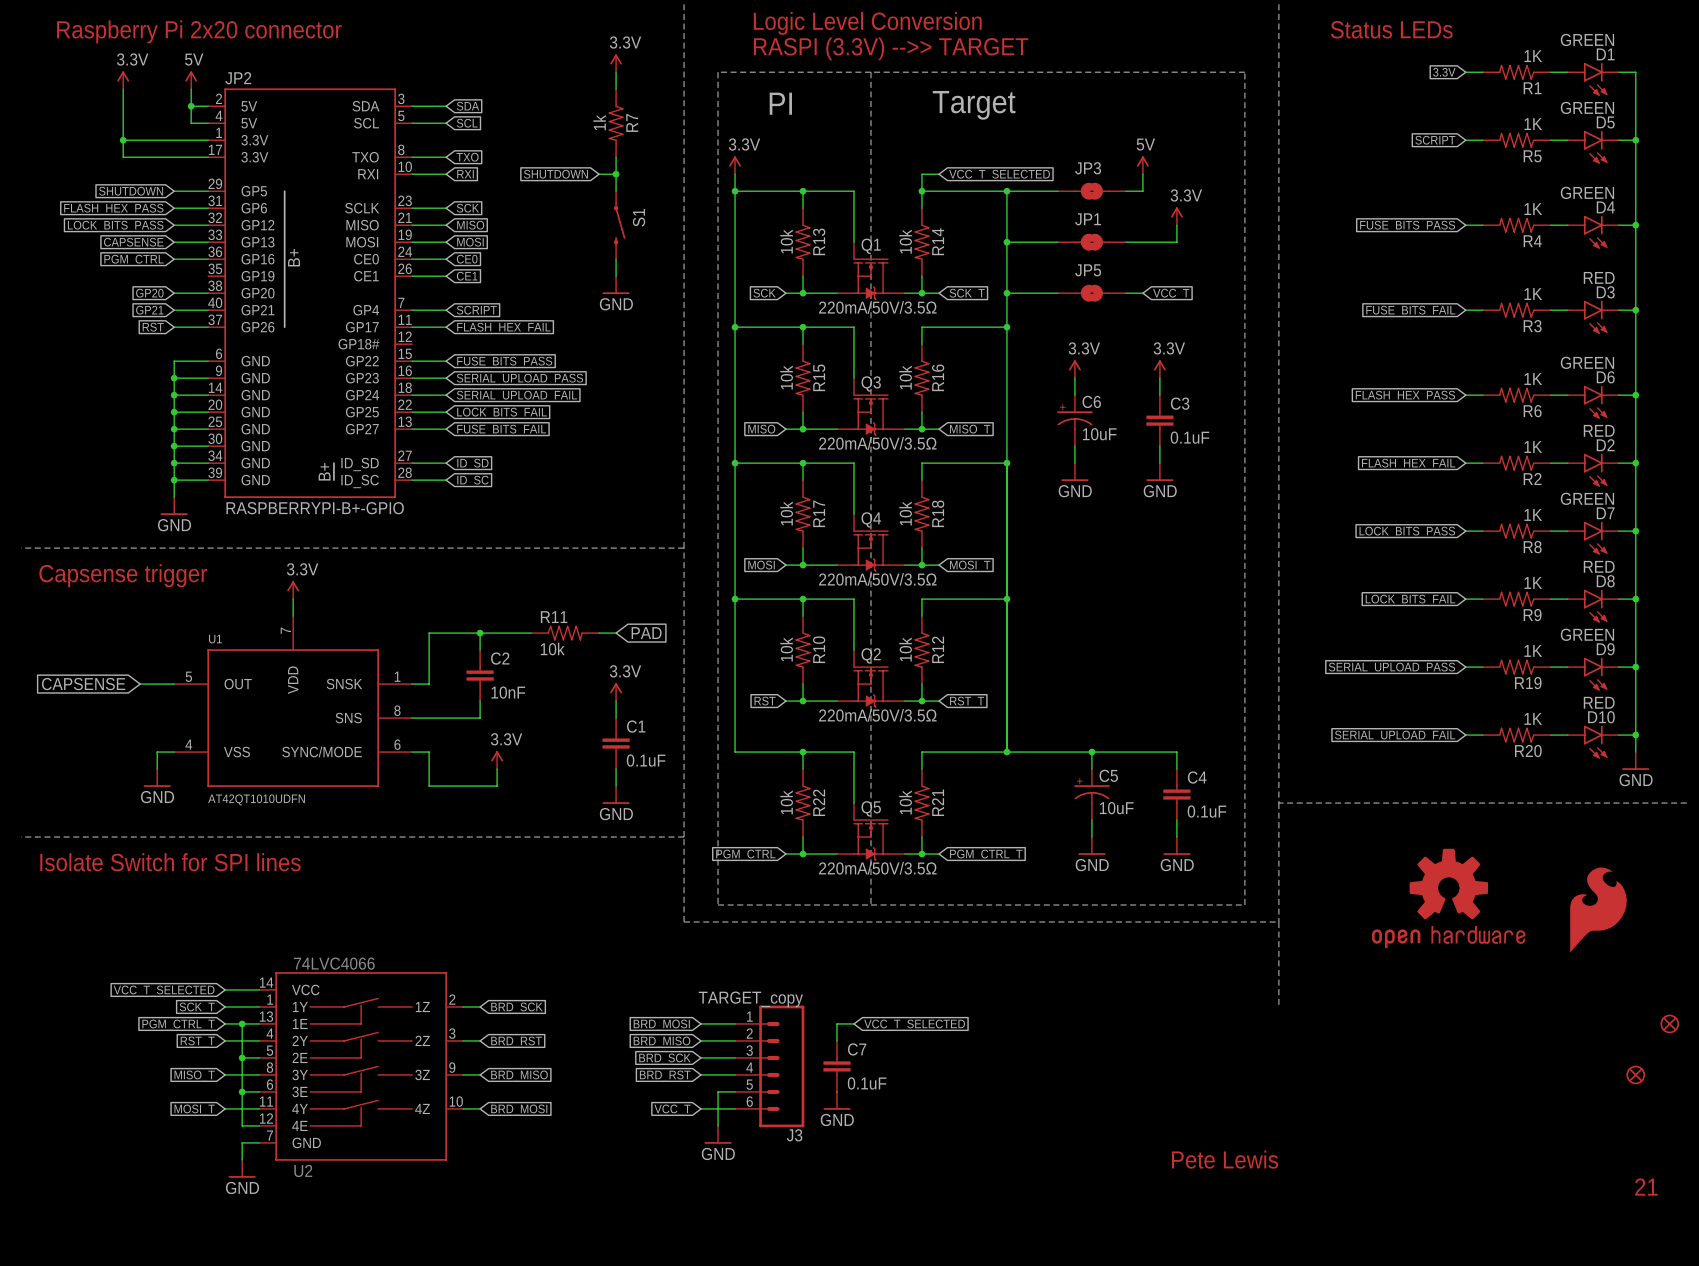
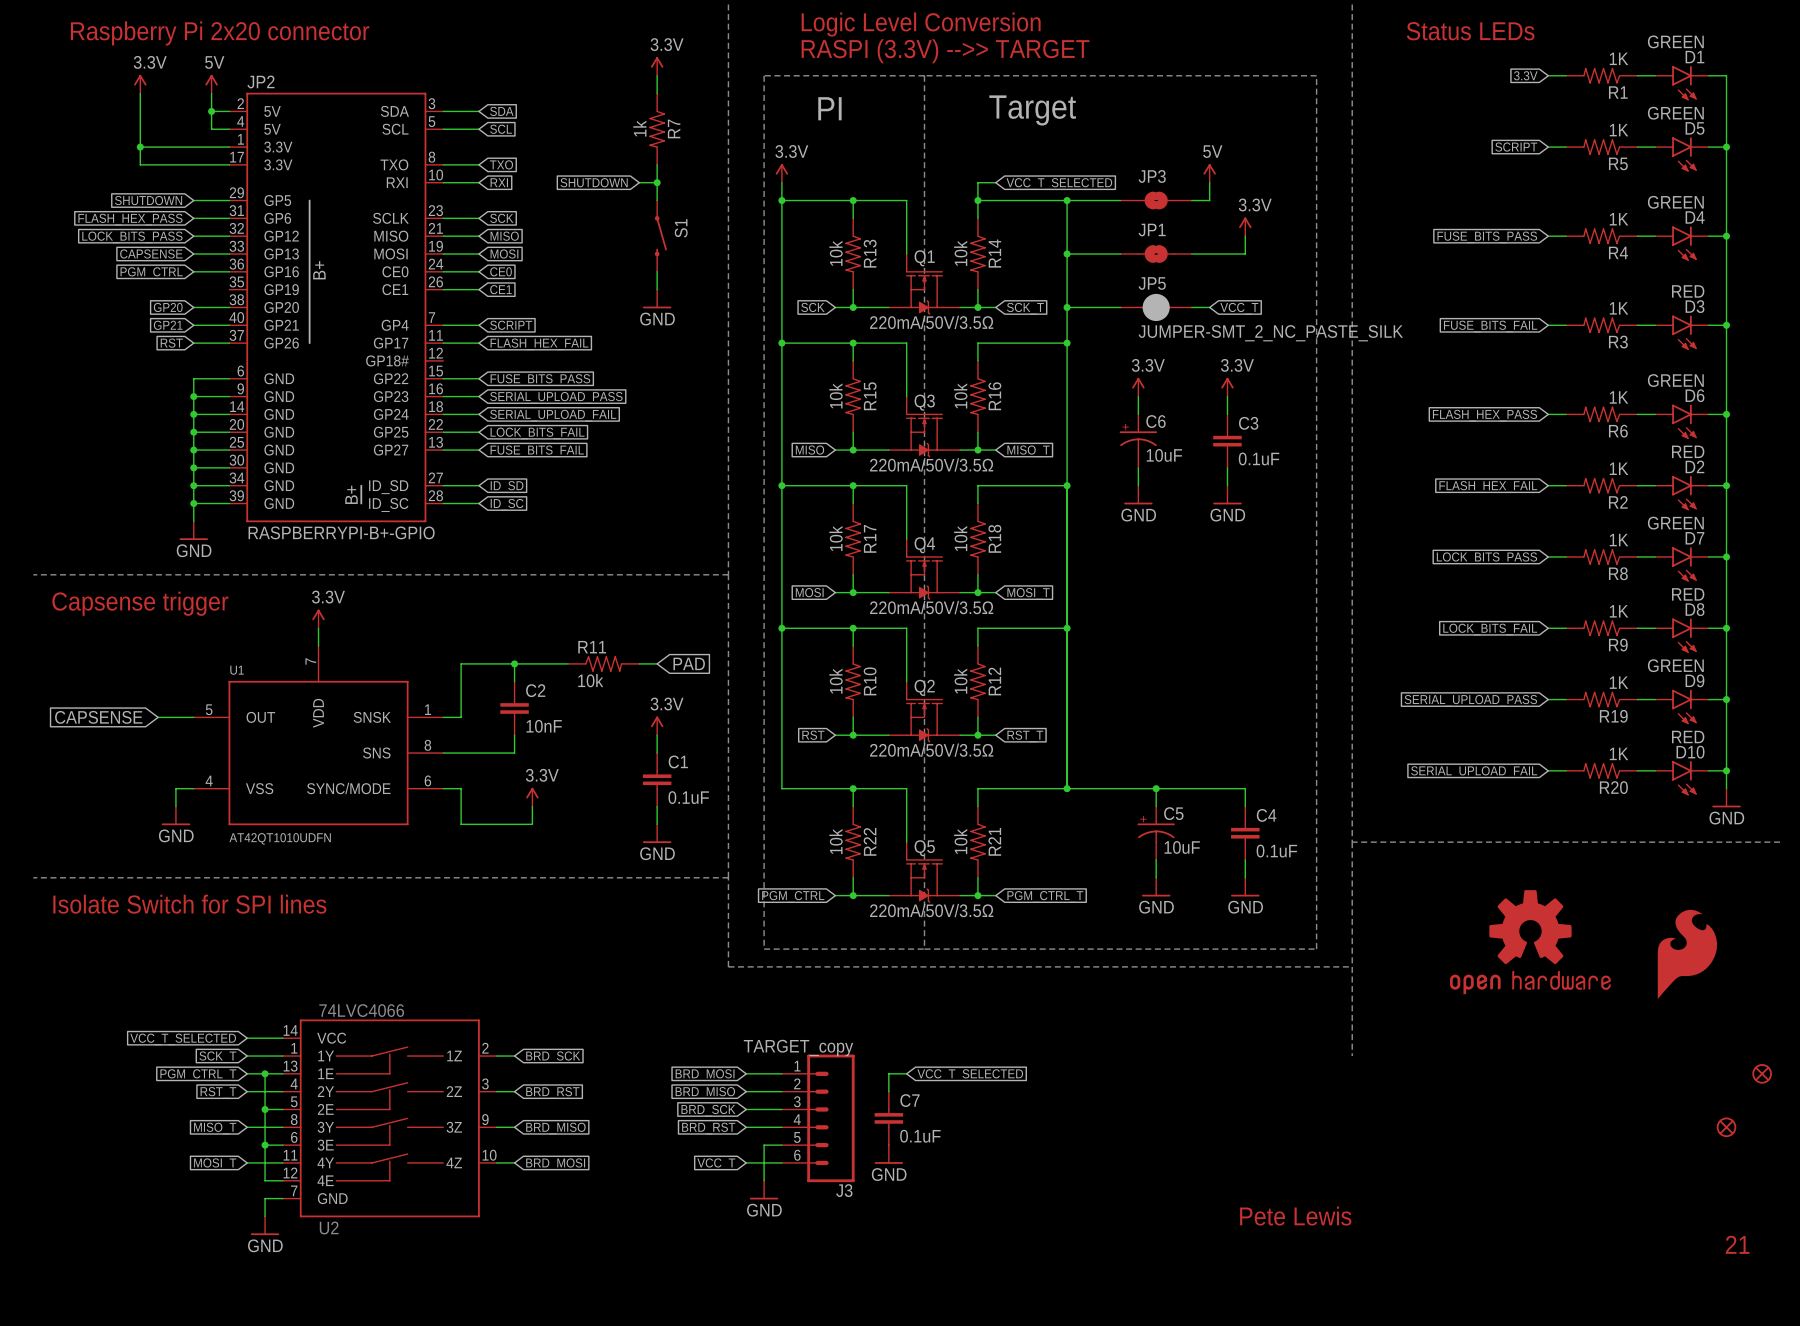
JP5 symbol: [1057, 284, 1126, 302] -> [1120, 293, 1192, 322]
JP5 value: none -> JUMPER-SMT_2_NC_PASTE_SILK (1270, 333)

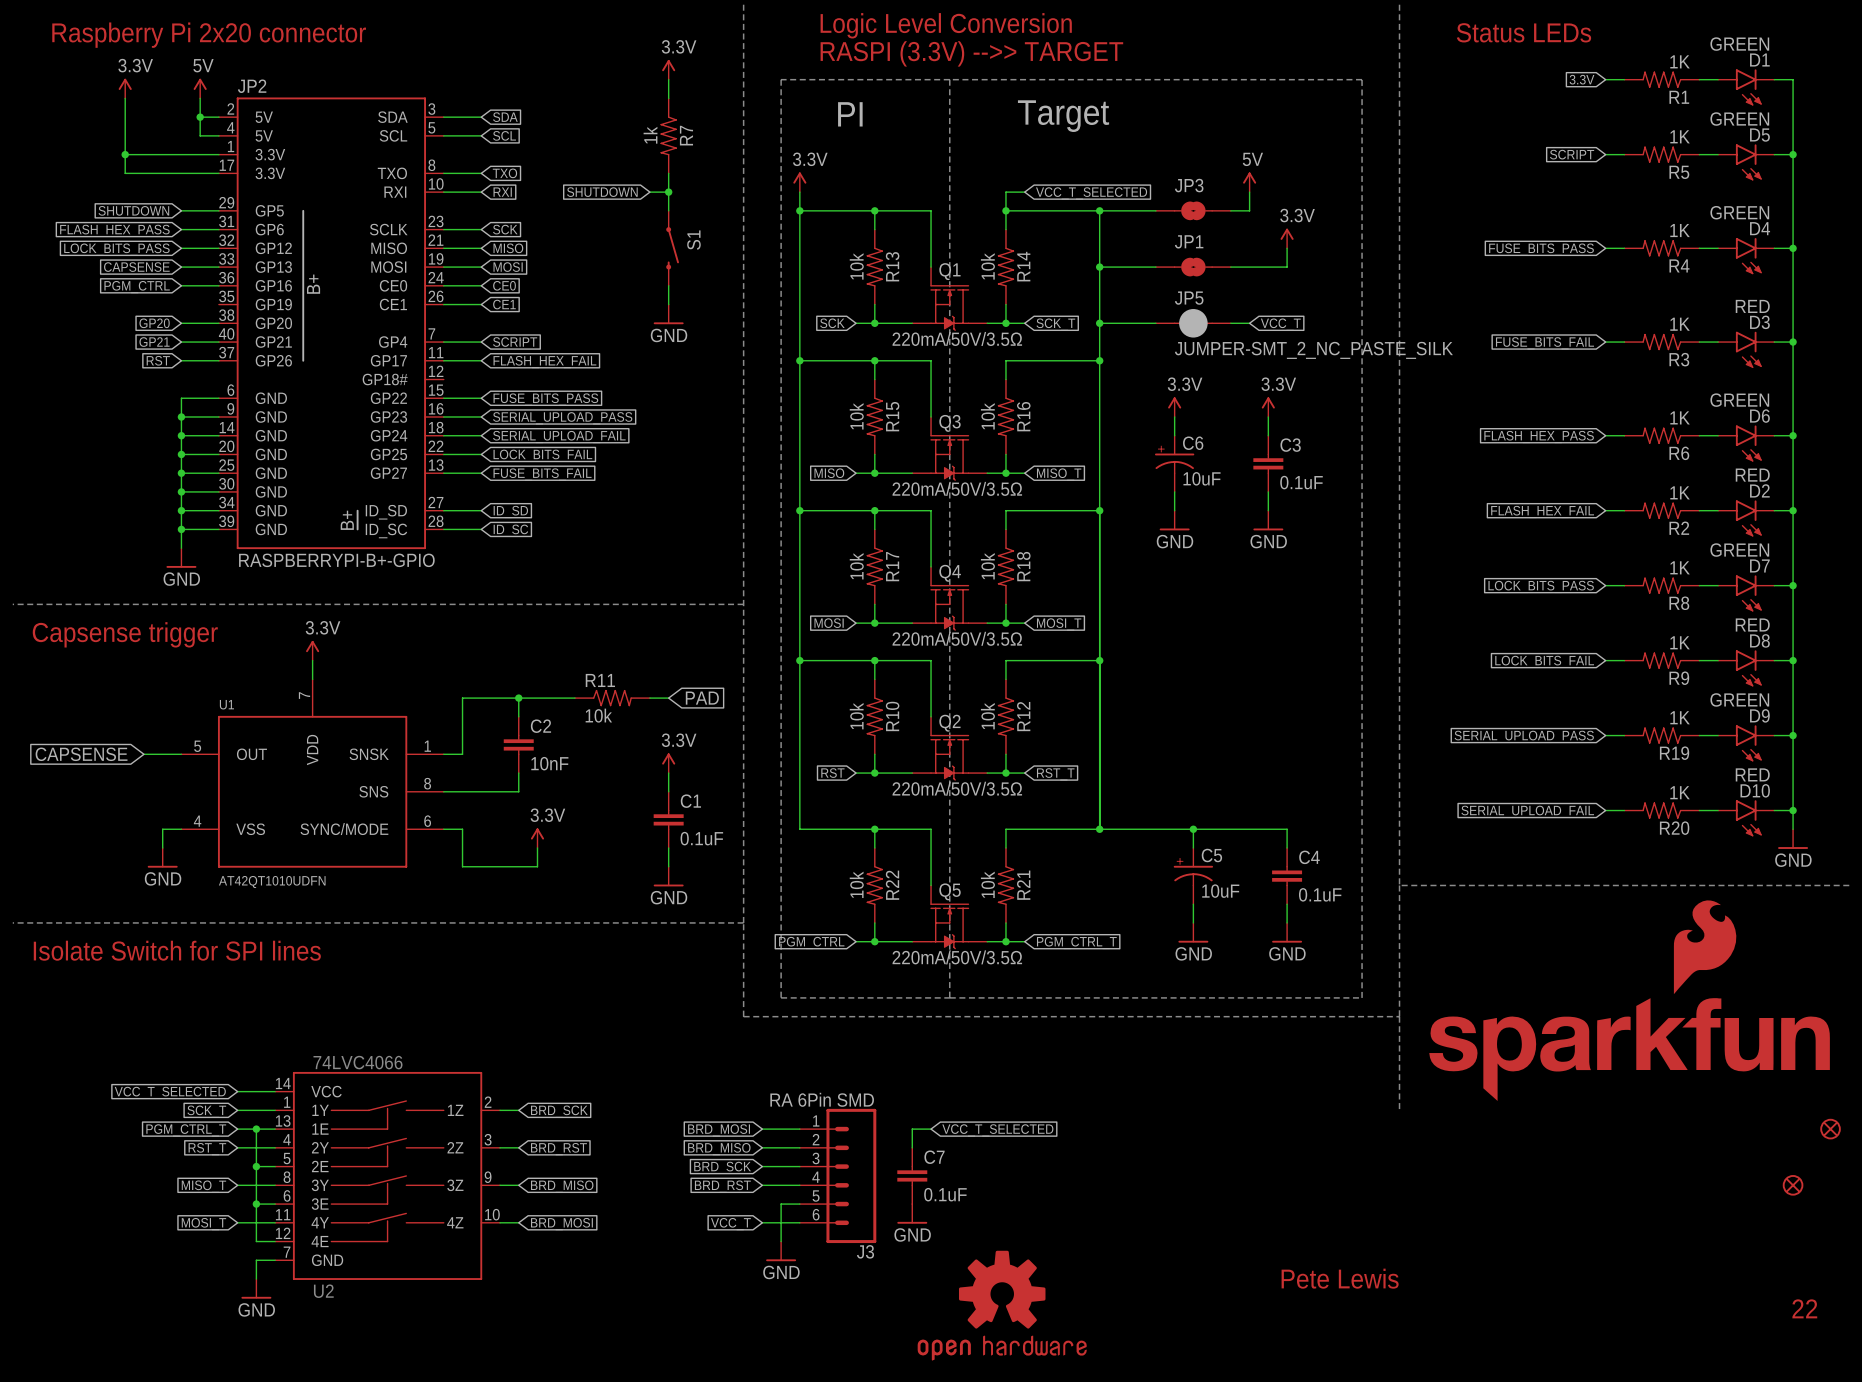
part: (1530, 942) -> none
part position: (1687, 954) -> (1705, 947)
part: none -> (1629, 1049)
J3 value: TARGET_copy (798, 1048) -> RA 6Pin SMD (822, 1099)
part: none -> (1002, 1305)
text: 21 (1737, 1244) -> 22 (1804, 1308)

